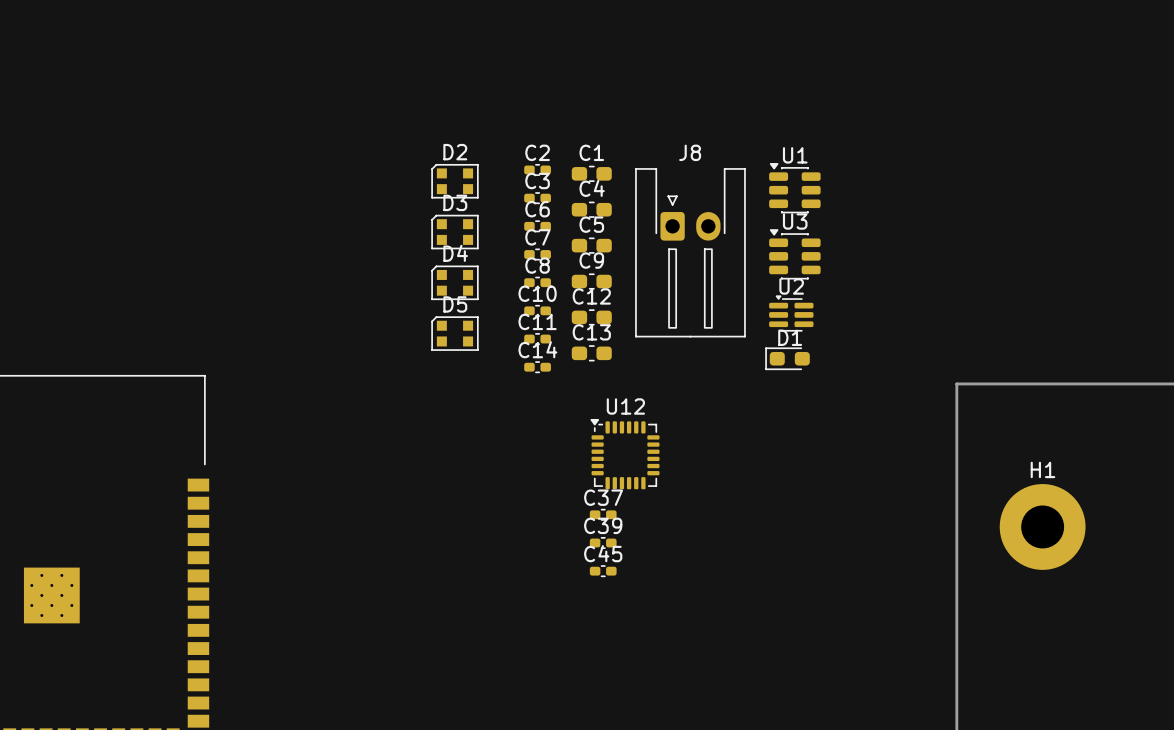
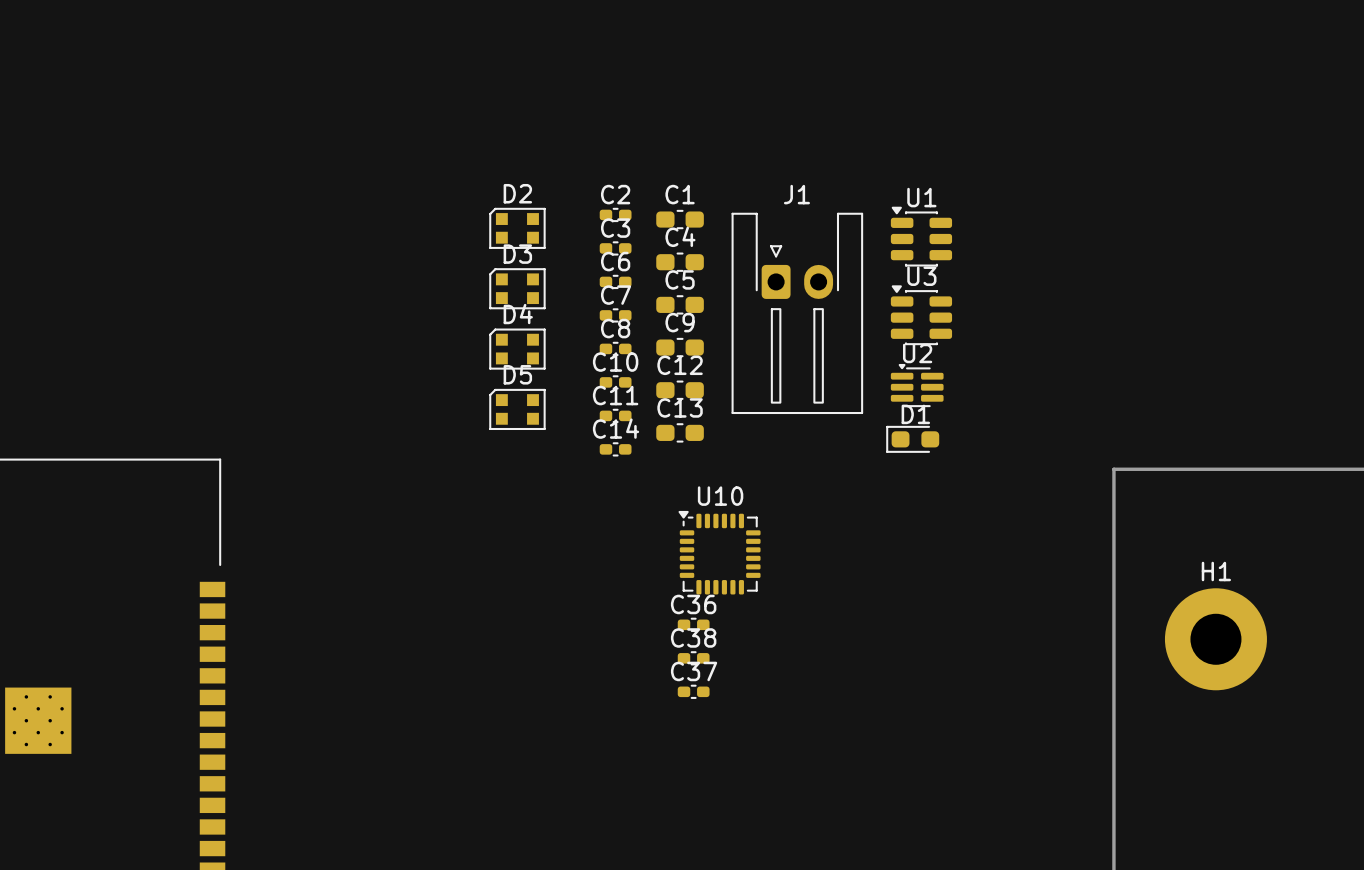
J8 name: J8 (690, 152) -> J1 (796, 194)
U12 name: U12 (625, 406) -> U10 (720, 496)
C37 name: C37 (603, 497) -> C36 (693, 604)
C39 name: C39 (603, 525) -> C38 (693, 637)
C45 name: C45 (603, 553) -> C37 (694, 671)

